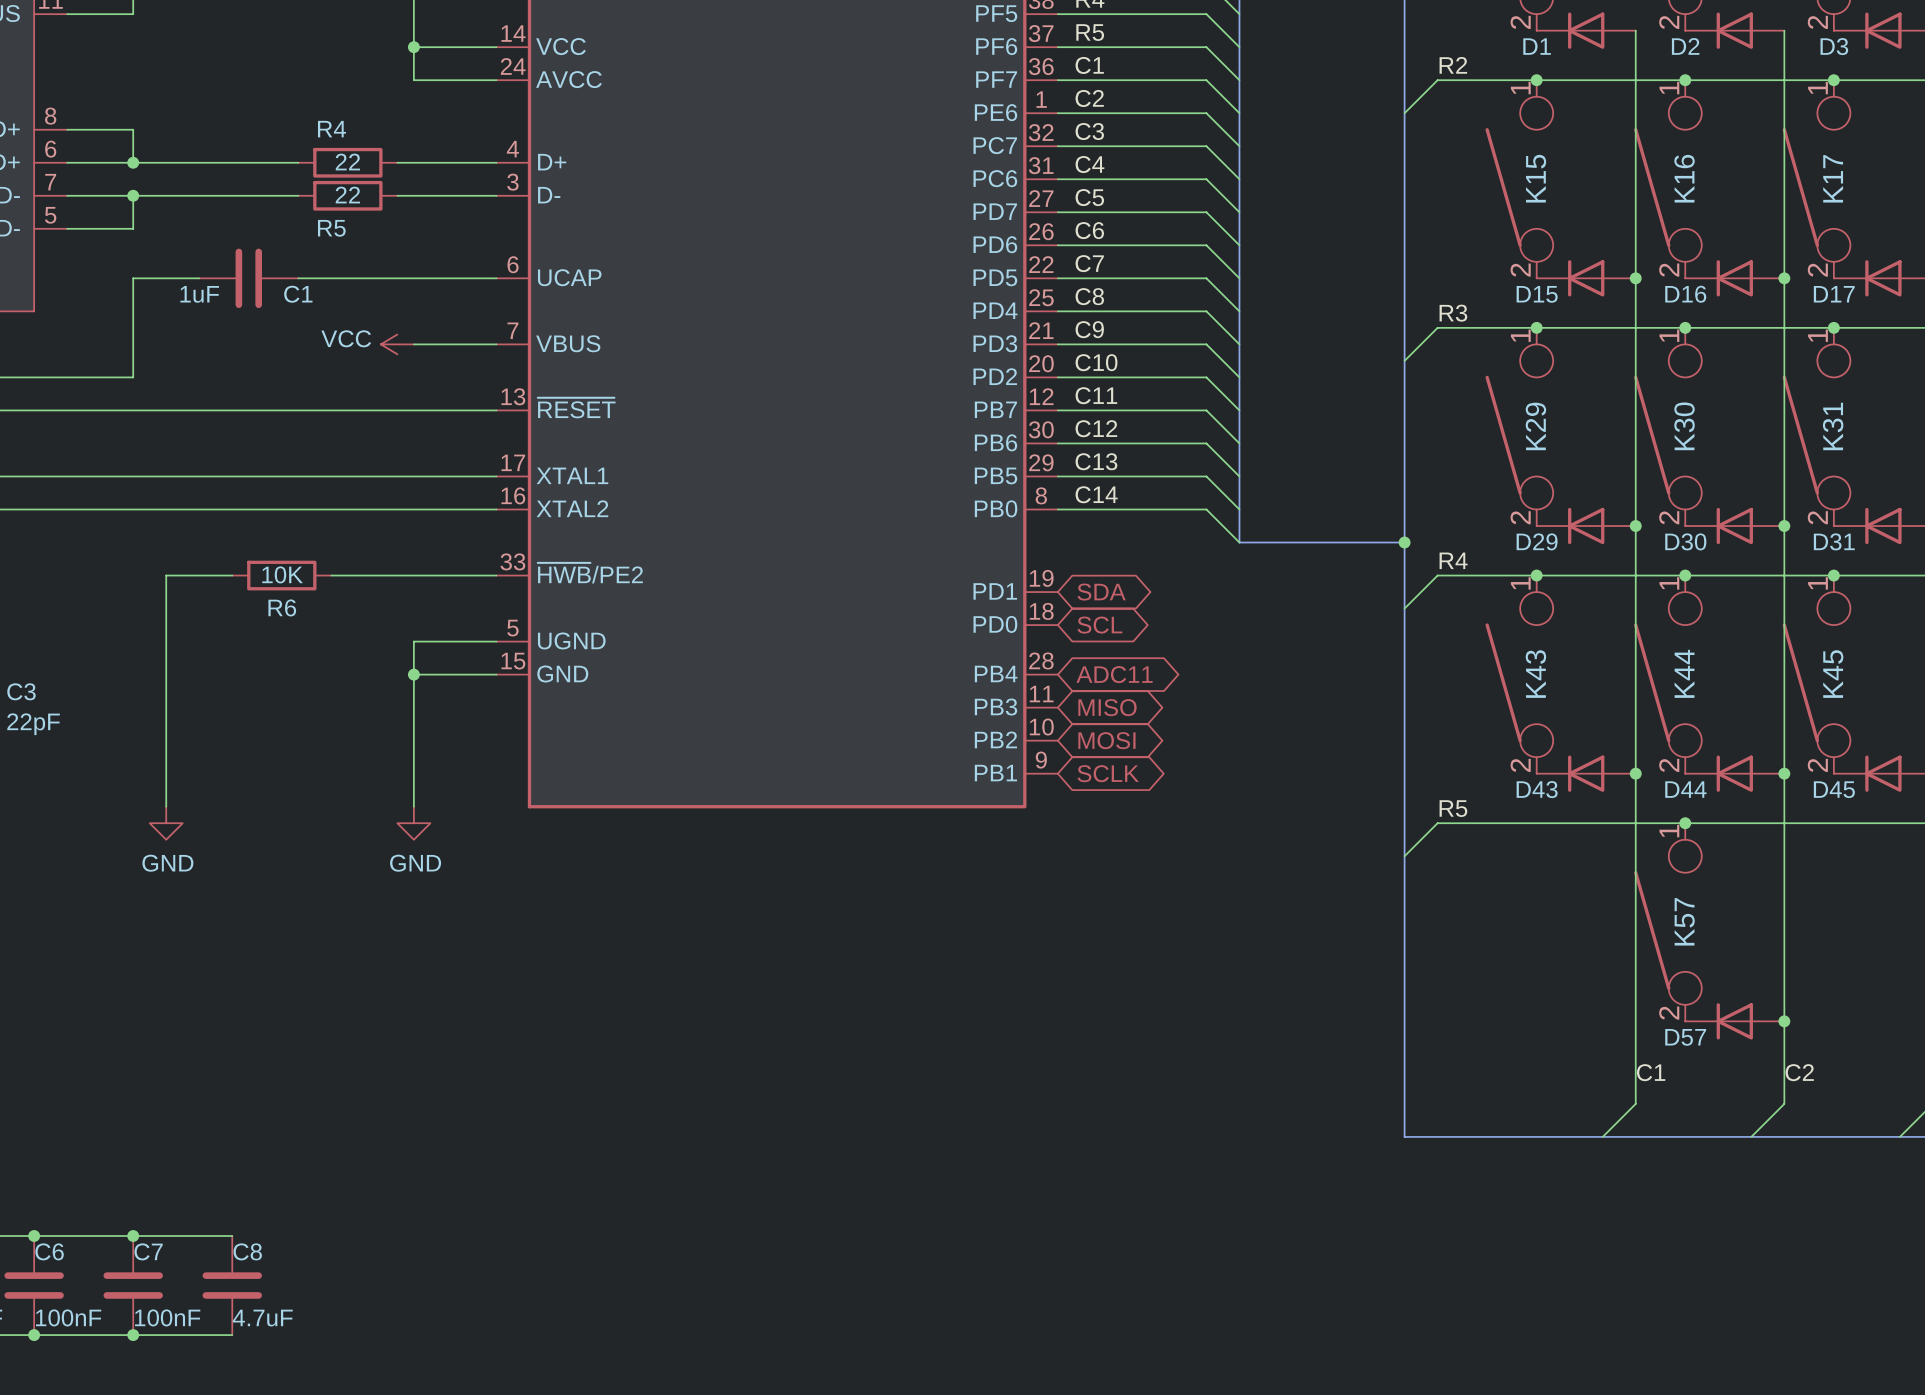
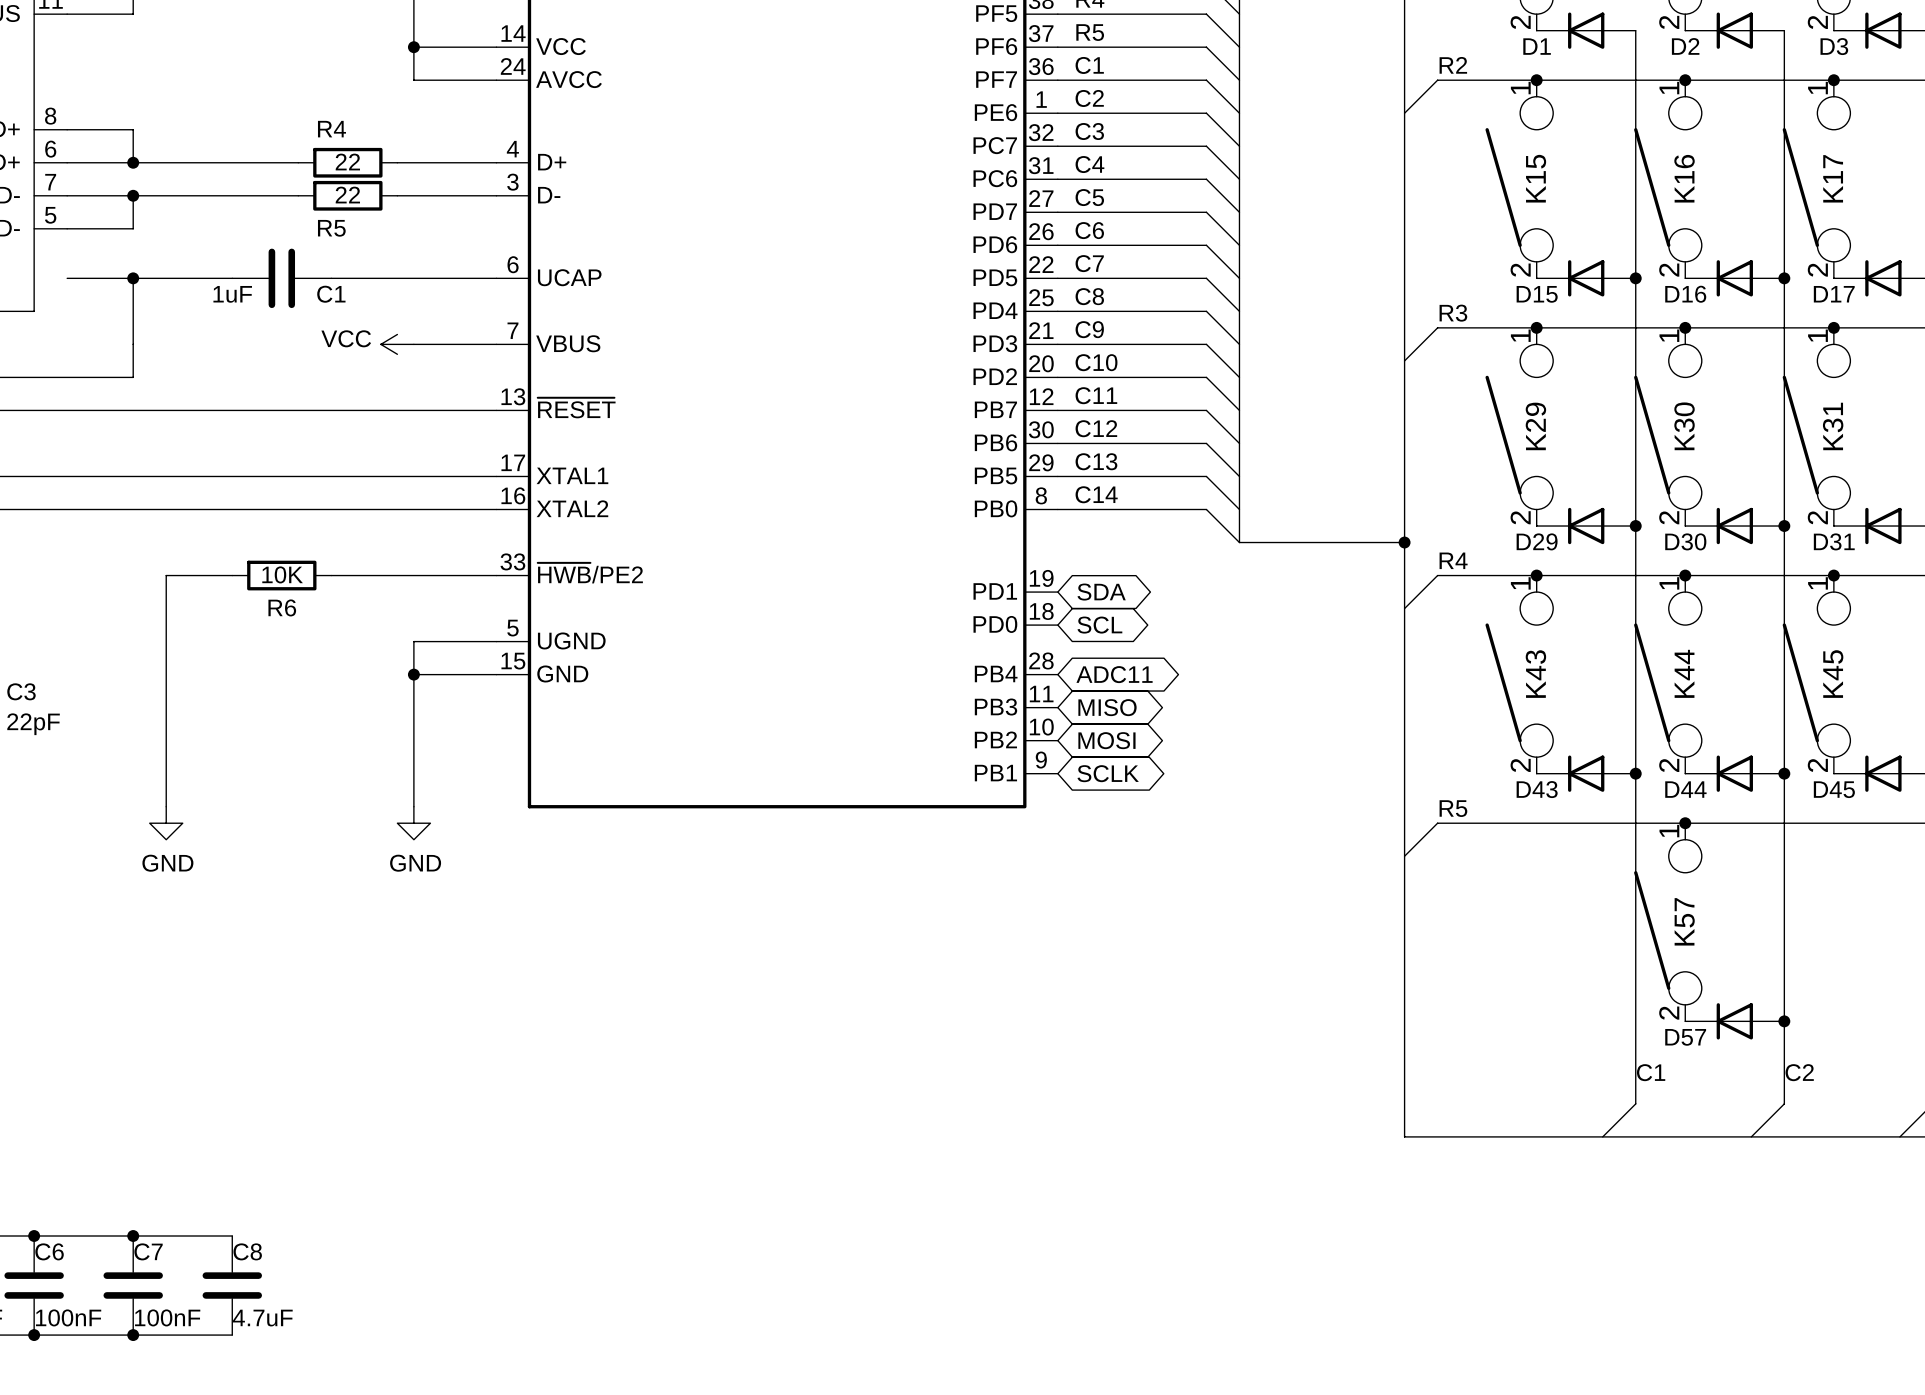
wire: none -> (67, 278) (133, 278)
junction: none -> (133, 278)
C1 position: (248, 278) -> (281, 278)

